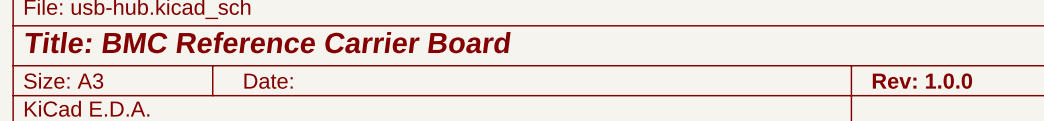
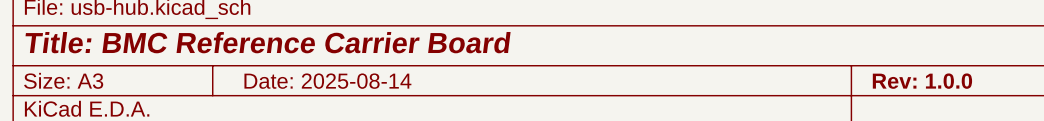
title block: Date: (268, 81) -> Date: 2025-08-14 (327, 81)

